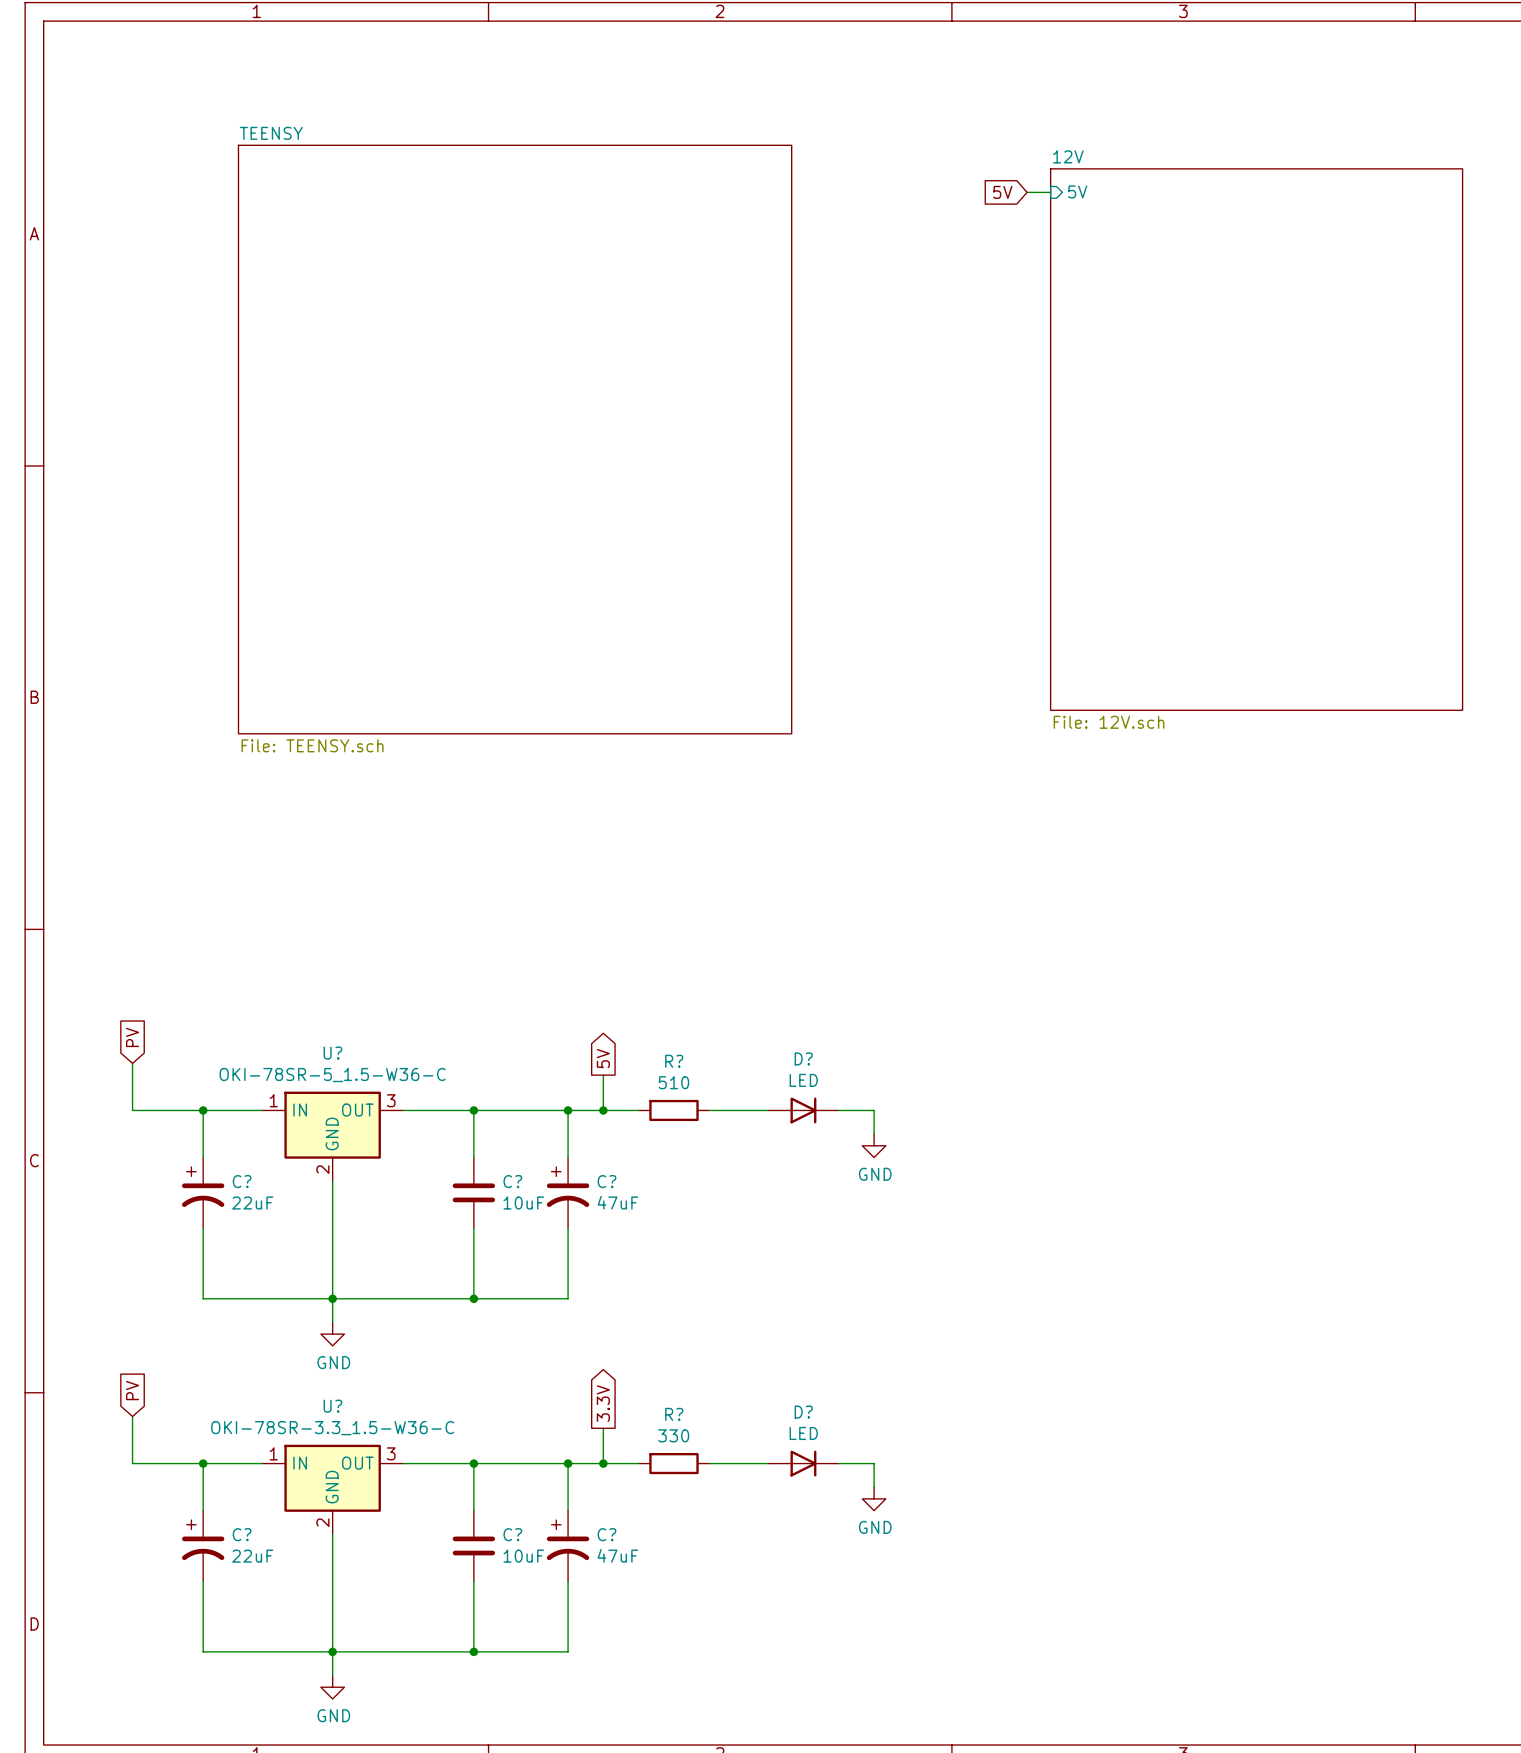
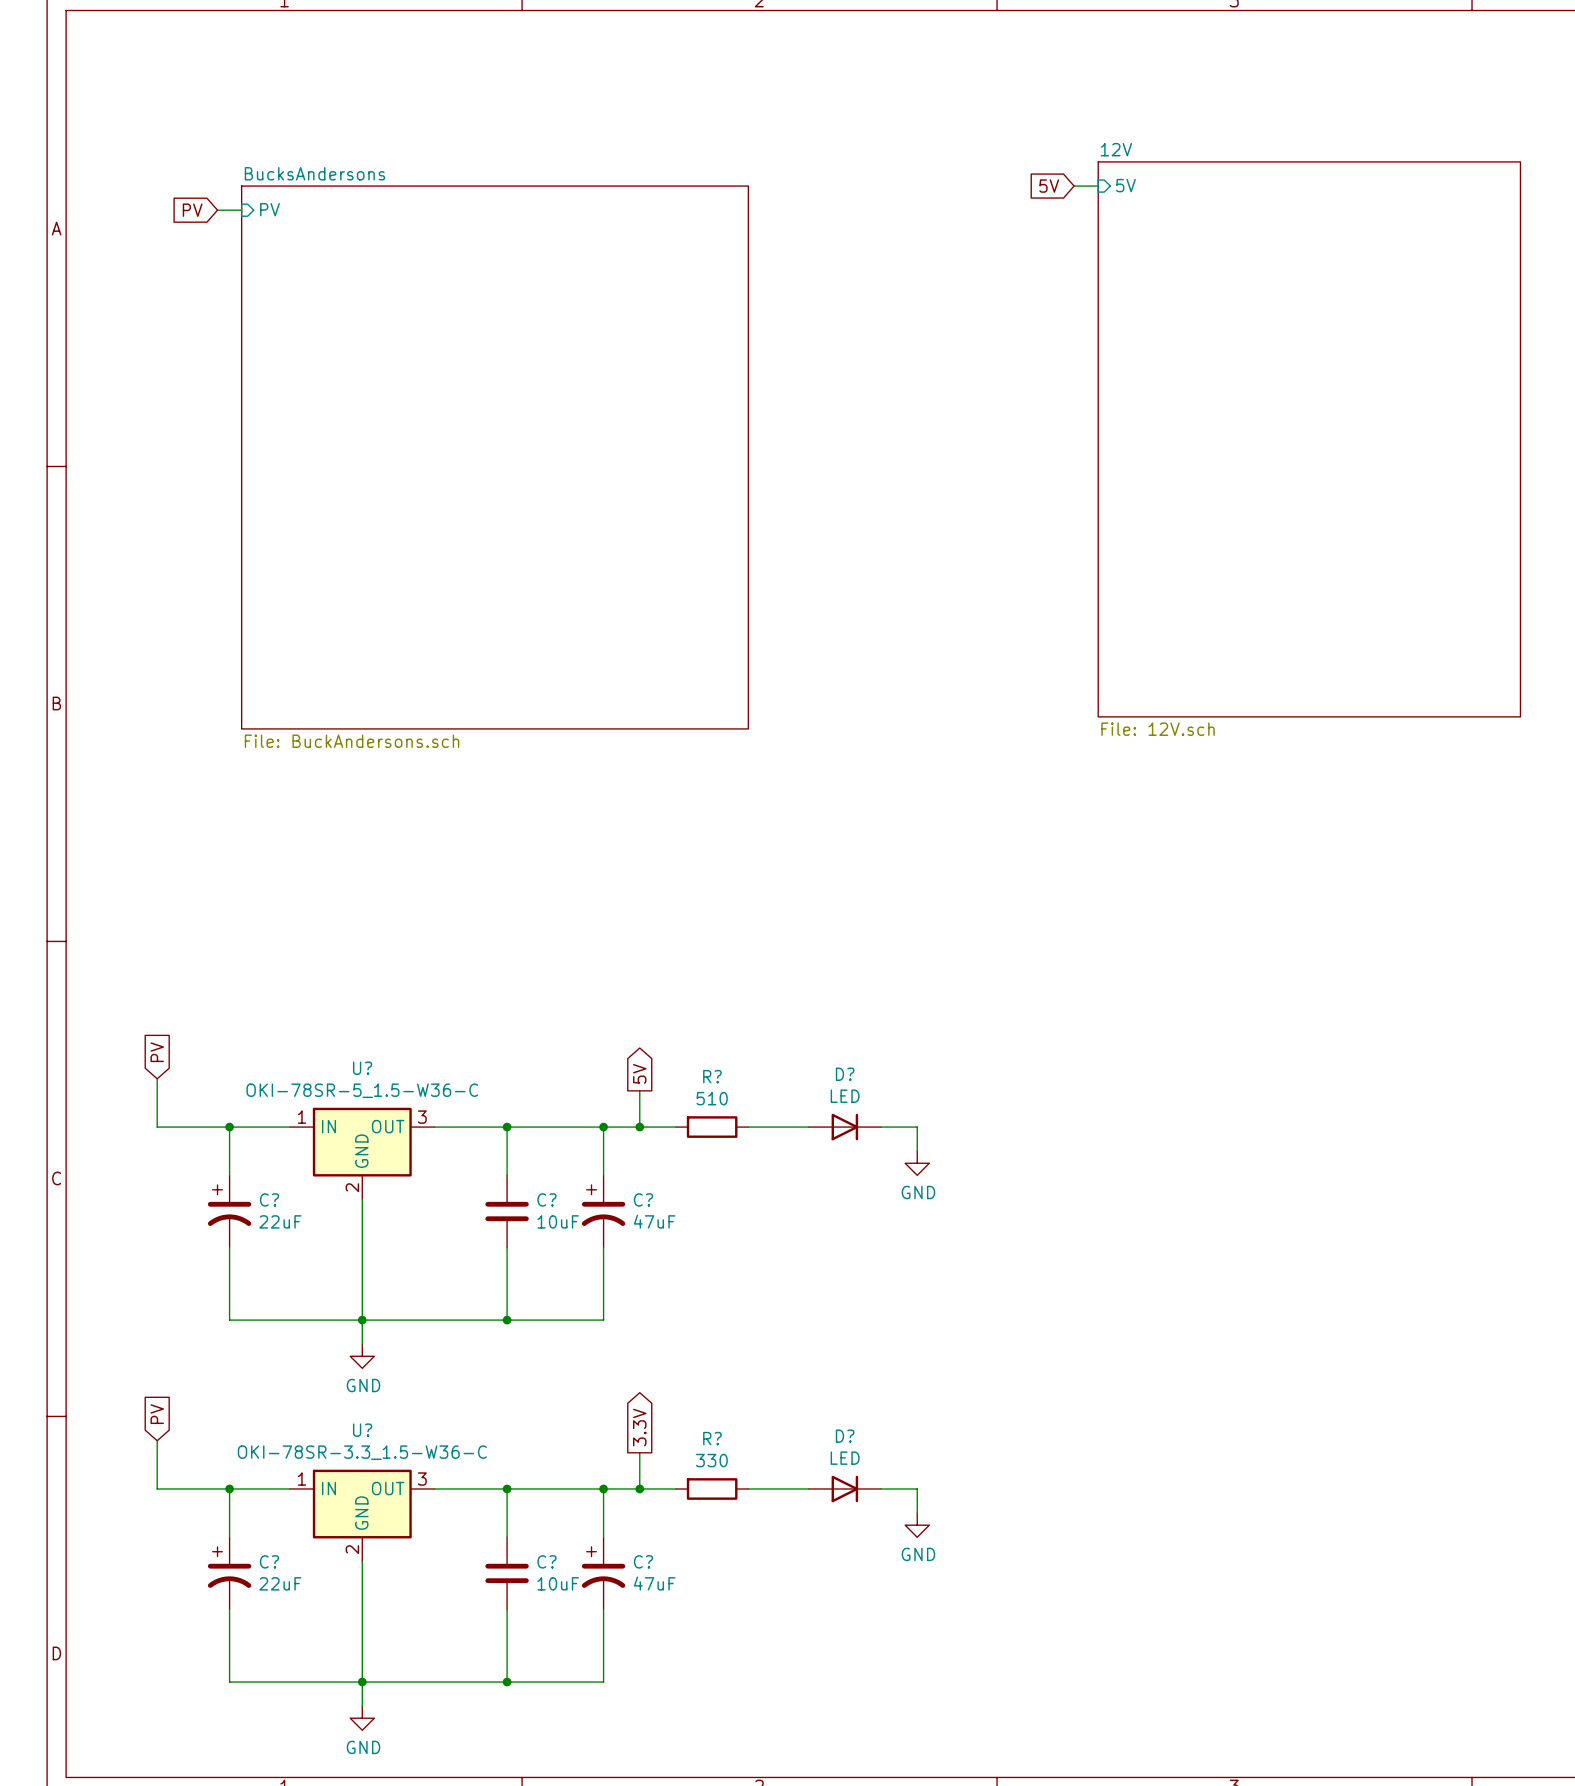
global label: none -> PV (192, 210)
wire: none -> (217, 210) (241, 210)
sheet pin: none -> PV (269, 209)
sheet TEENSY: File: TEENSY.sch (515, 439) -> none
sheet BucksAndersons: none -> File: BuckAndersons.sch (495, 457)

